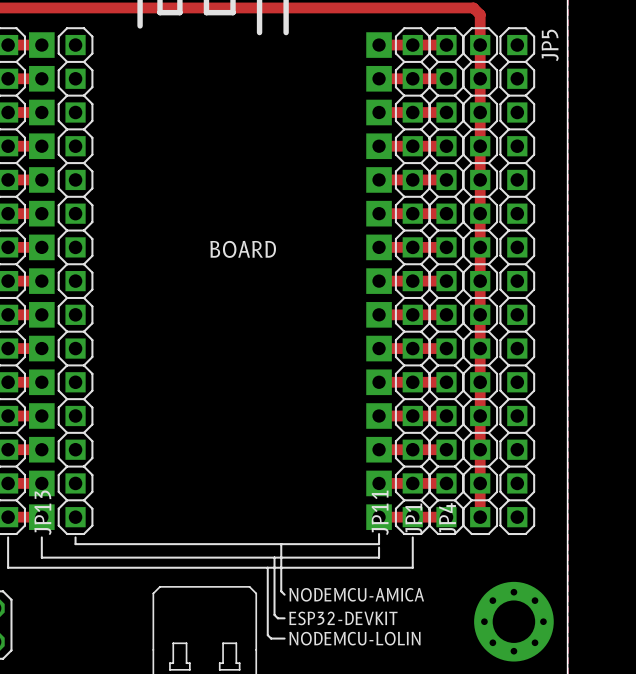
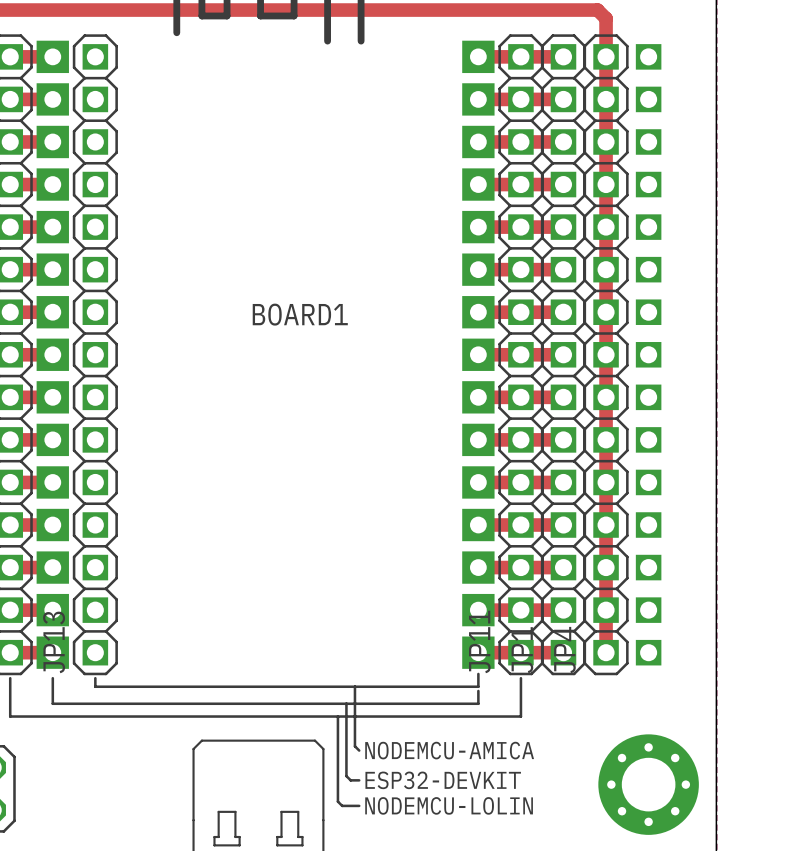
BOARD name: BOARD (243, 249) -> BOARD1 (300, 314)
JP5 side: top (517, 281) -> bottom (648, 354)

